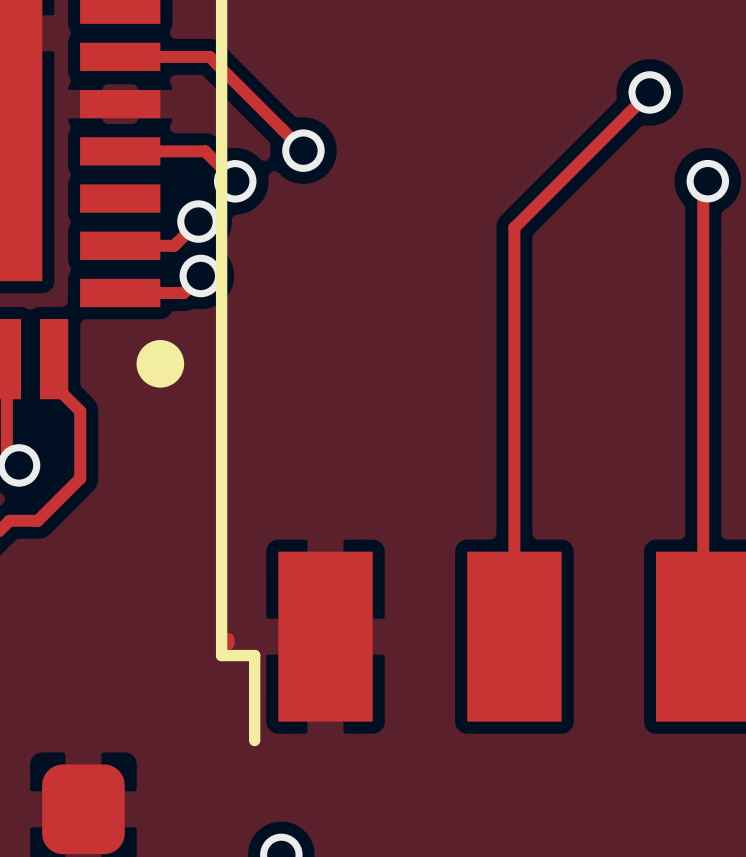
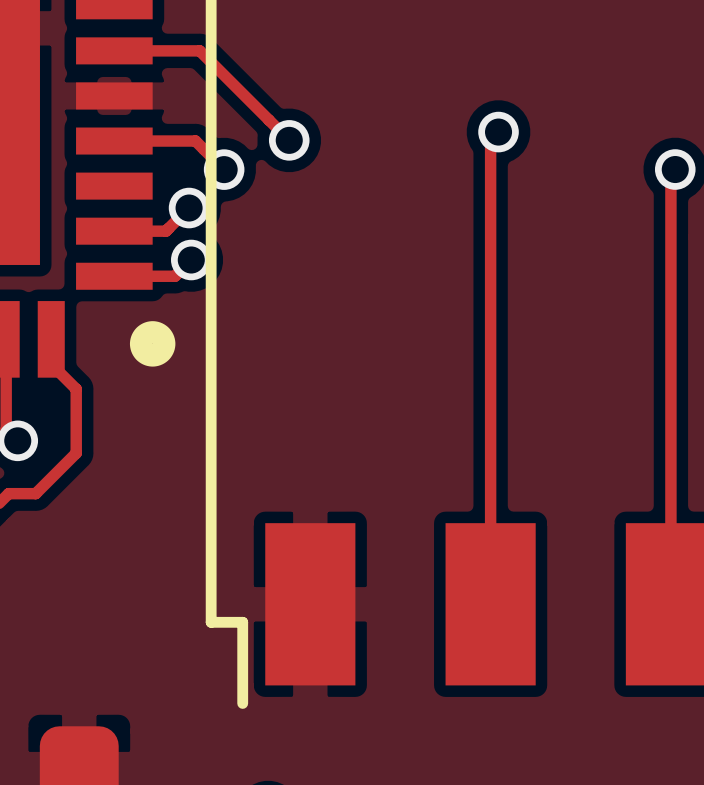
track: (649, 92) (514, 227) -> (498, 132) (490, 139) (490, 213)
via position: (649, 92) -> (498, 132)
track: (228, 638) (228, 643) -> none

